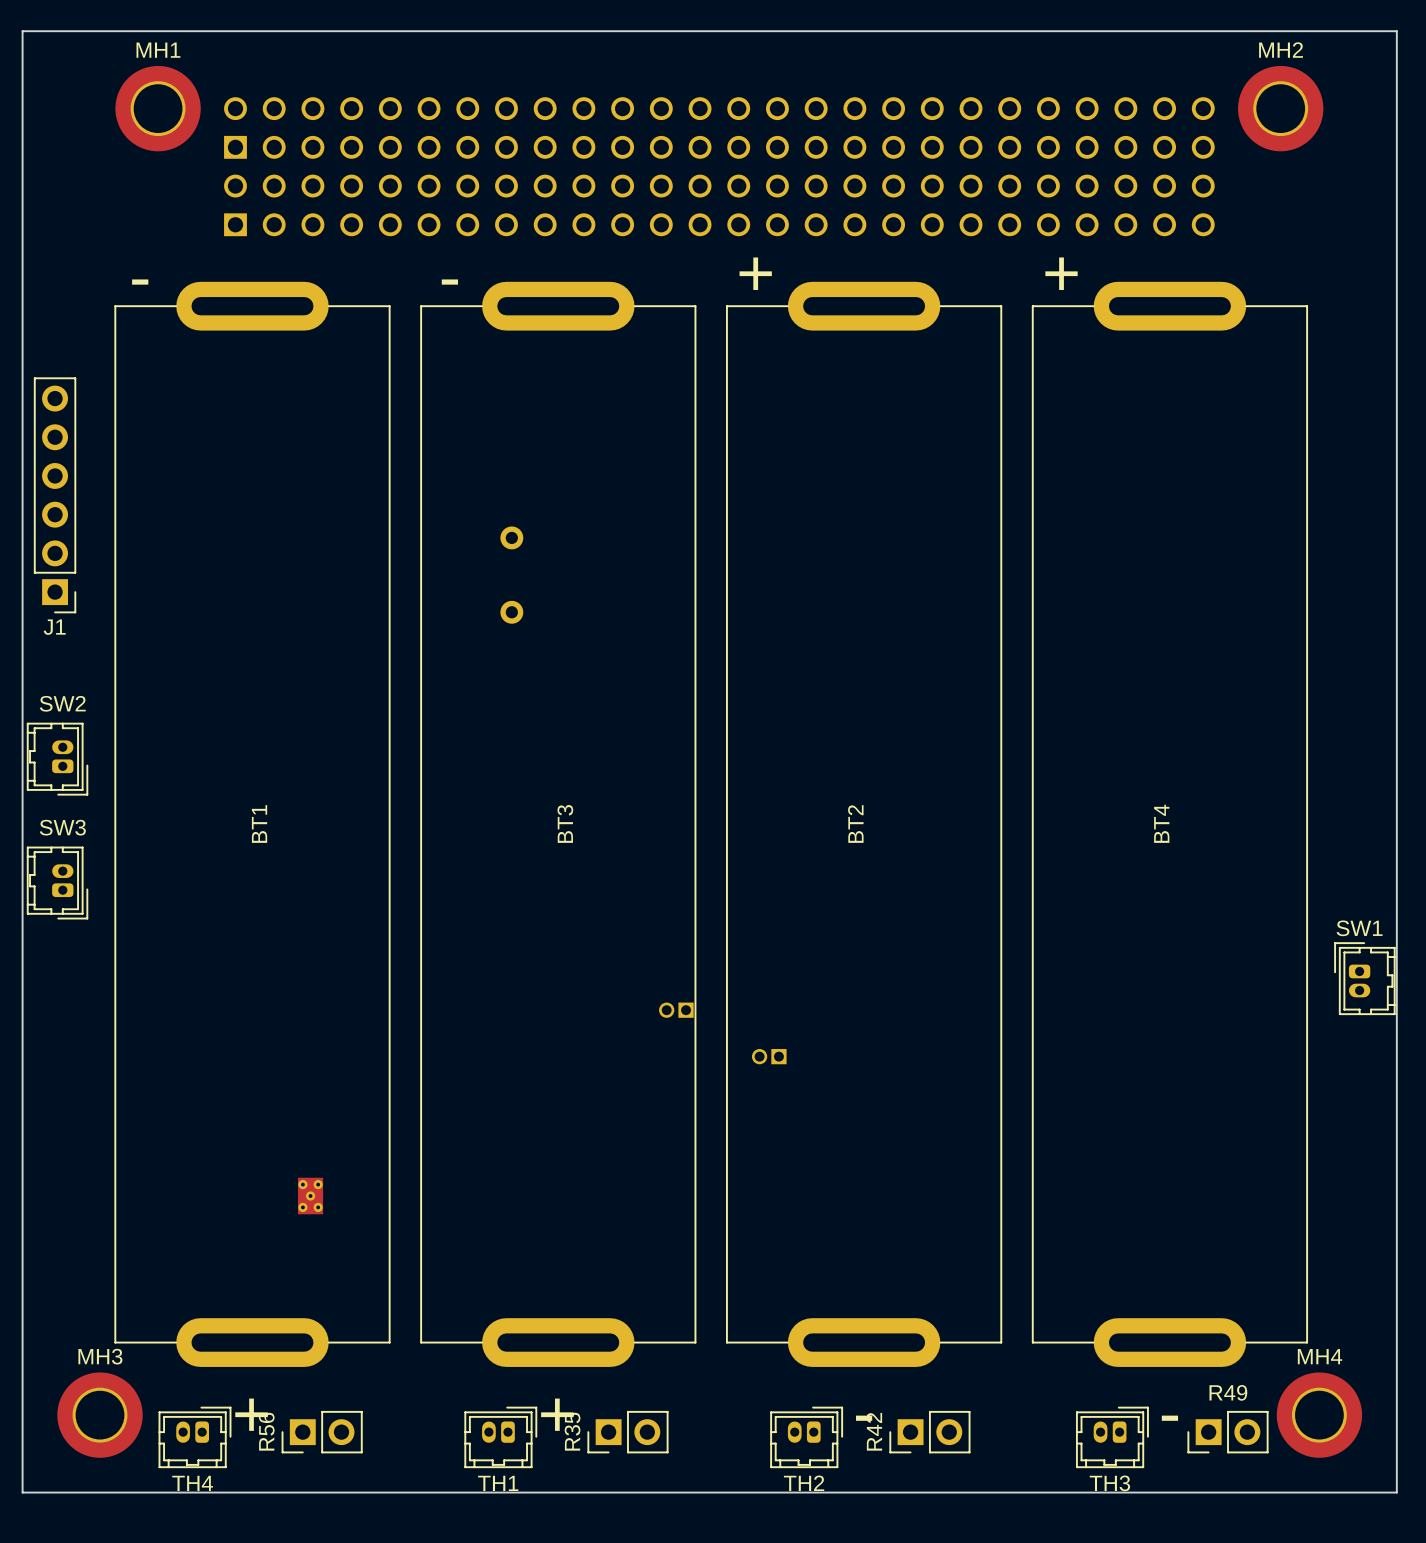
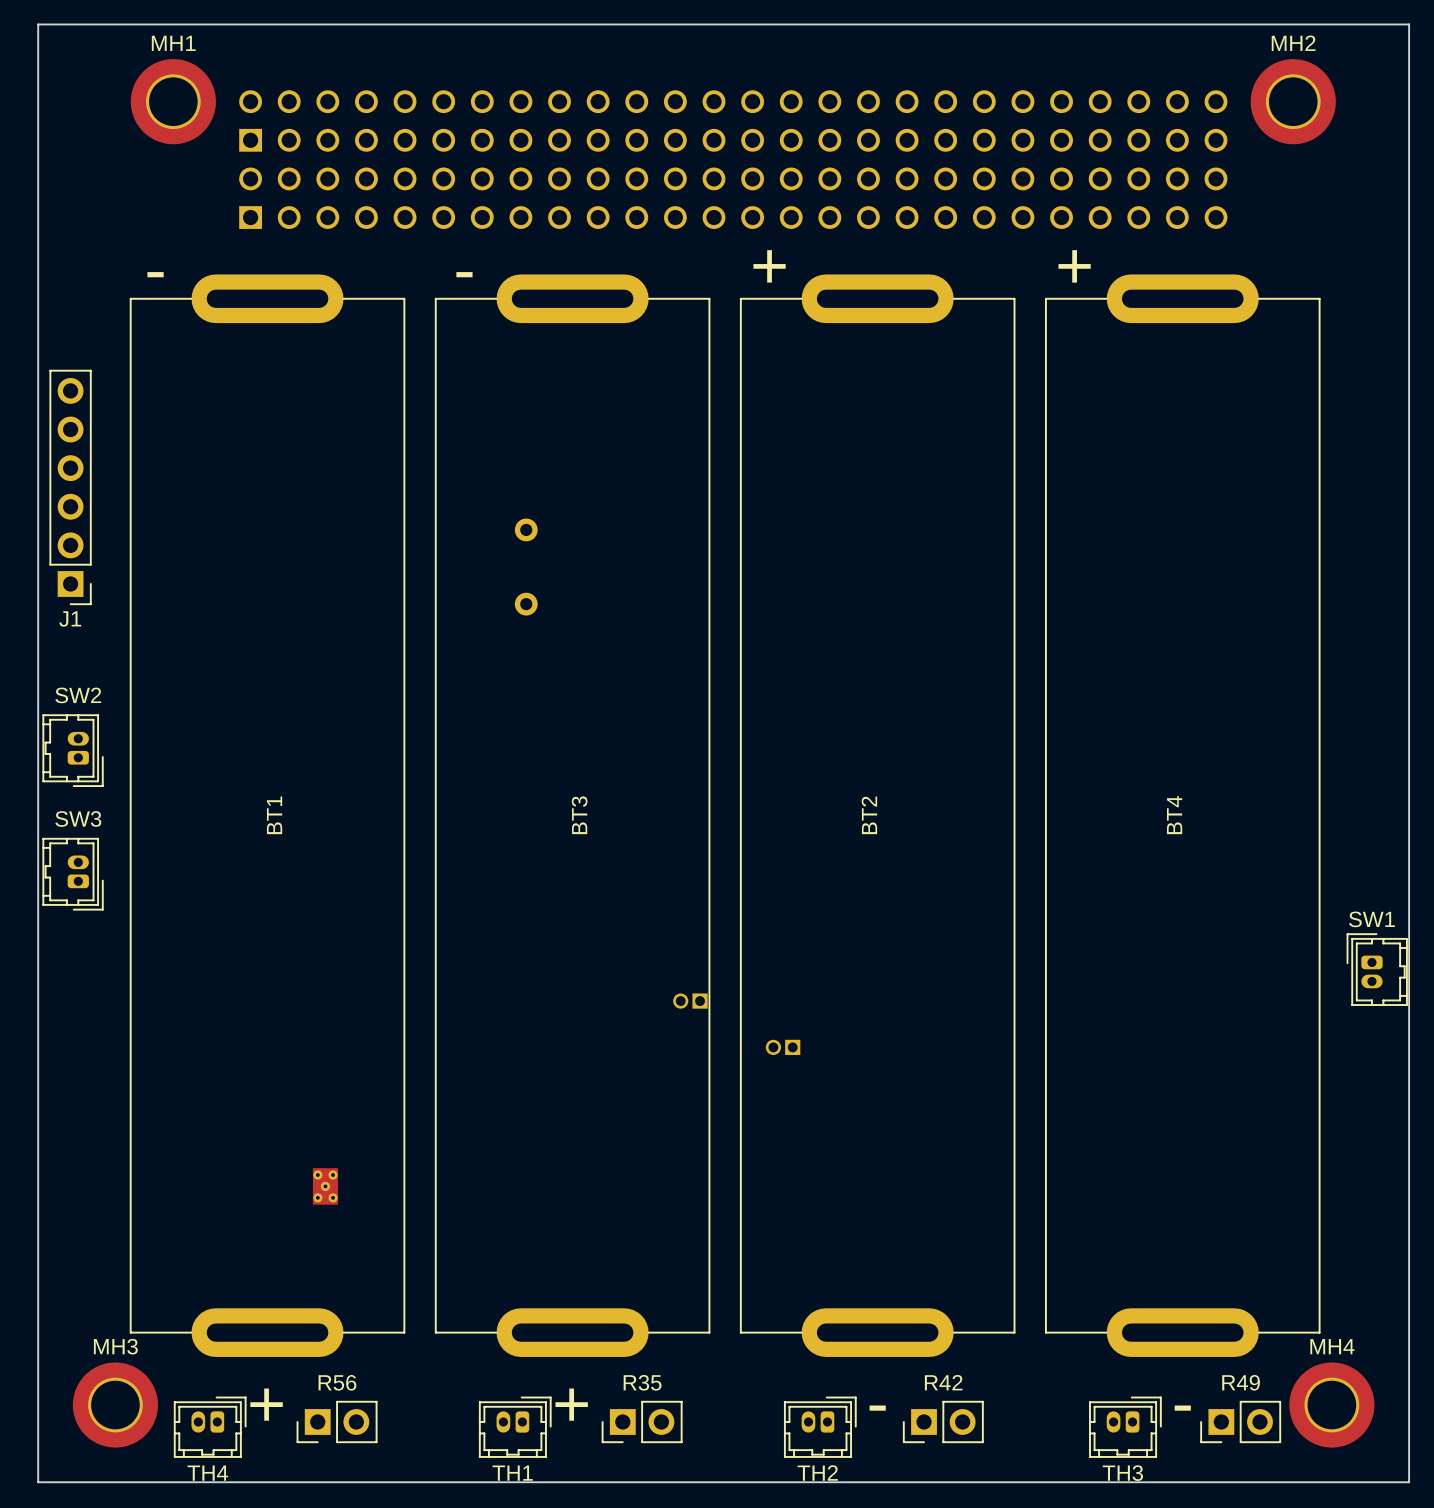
R56 name rotation: 0° (266, 1431) -> 90° clockwise (337, 1382)
R56 name position: R56 (266, 1431) -> R56 (337, 1382)
R35 name rotation: 0° (572, 1431) -> 90° clockwise (642, 1382)
R35 name position: R35 (572, 1431) -> R35 (642, 1382)
R42 name rotation: 0° (874, 1431) -> 90° clockwise (943, 1382)
R42 name position: R42 (874, 1431) -> R42 (943, 1382)

